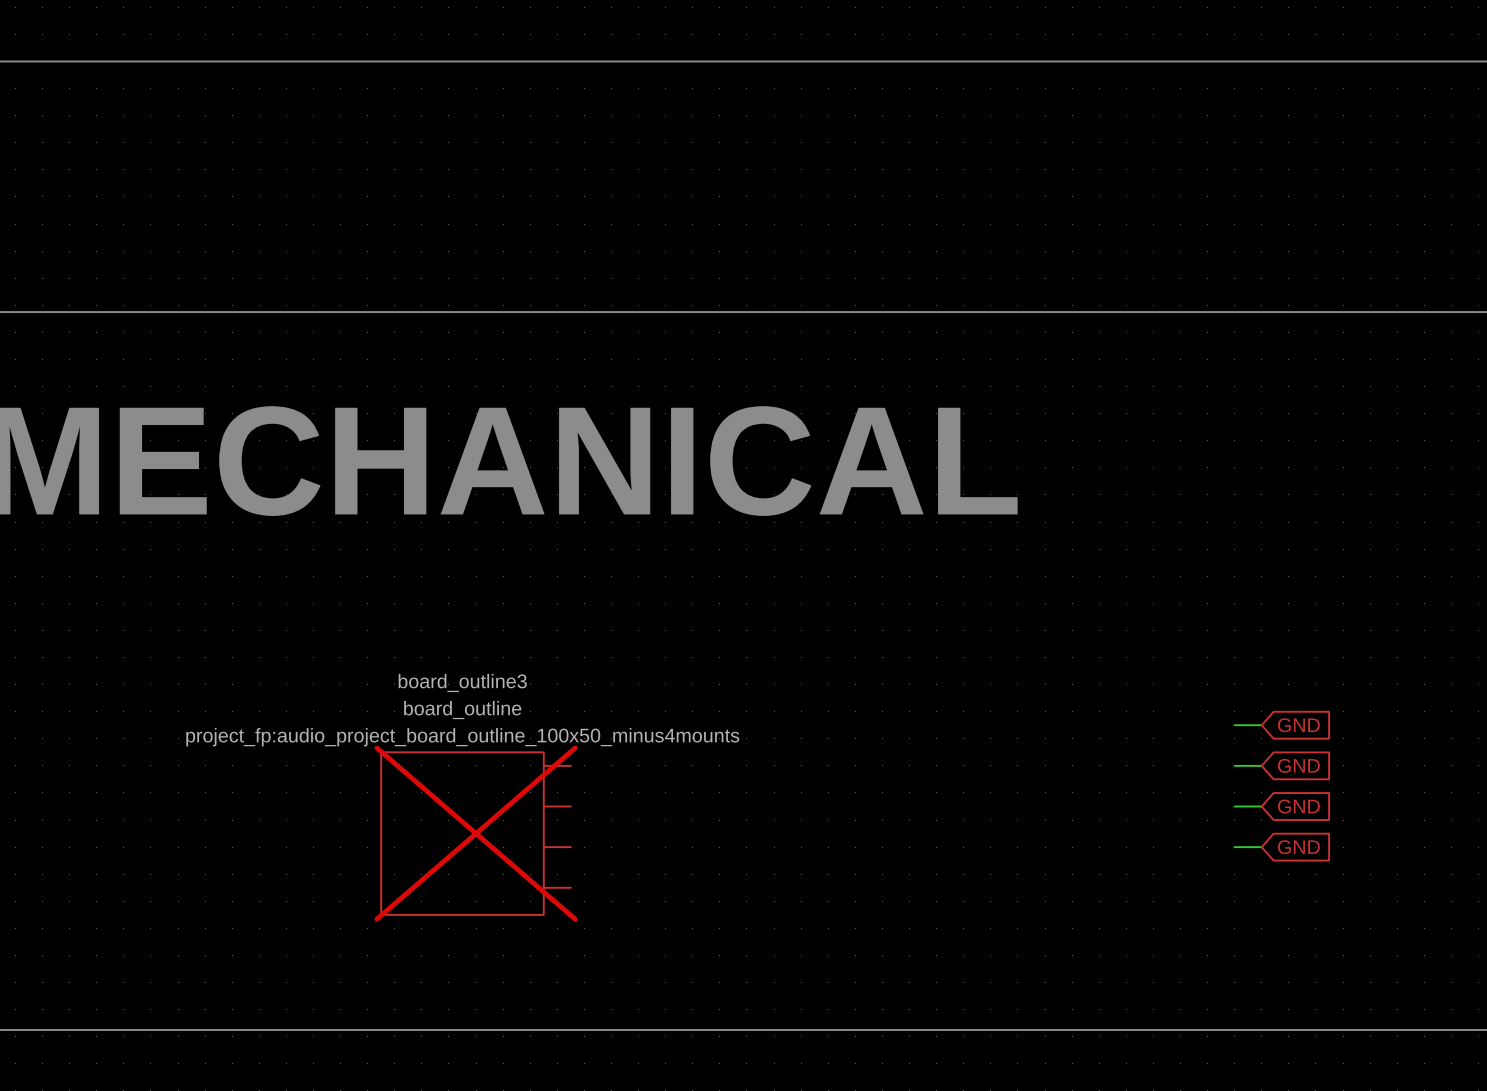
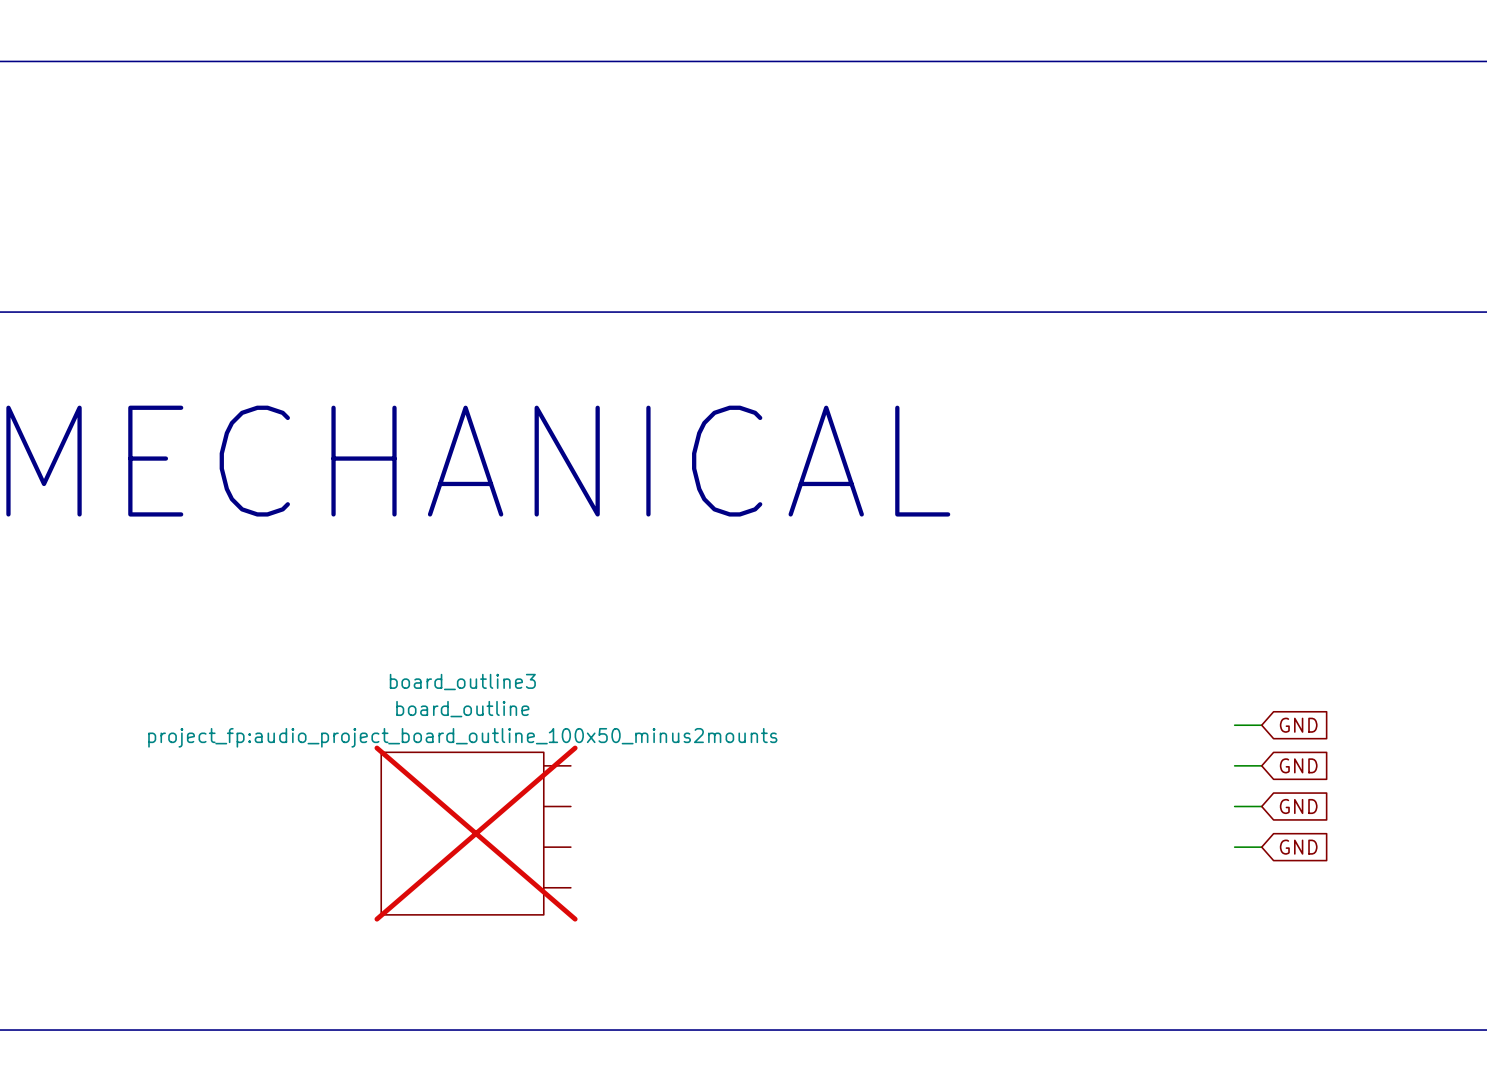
board_outline3 text: project_fp:audio_project_board_outline_100x50_minus4mounts (462, 737) -> project_fp:audio_project_board_outline_100x50_minus2mounts (462, 737)

